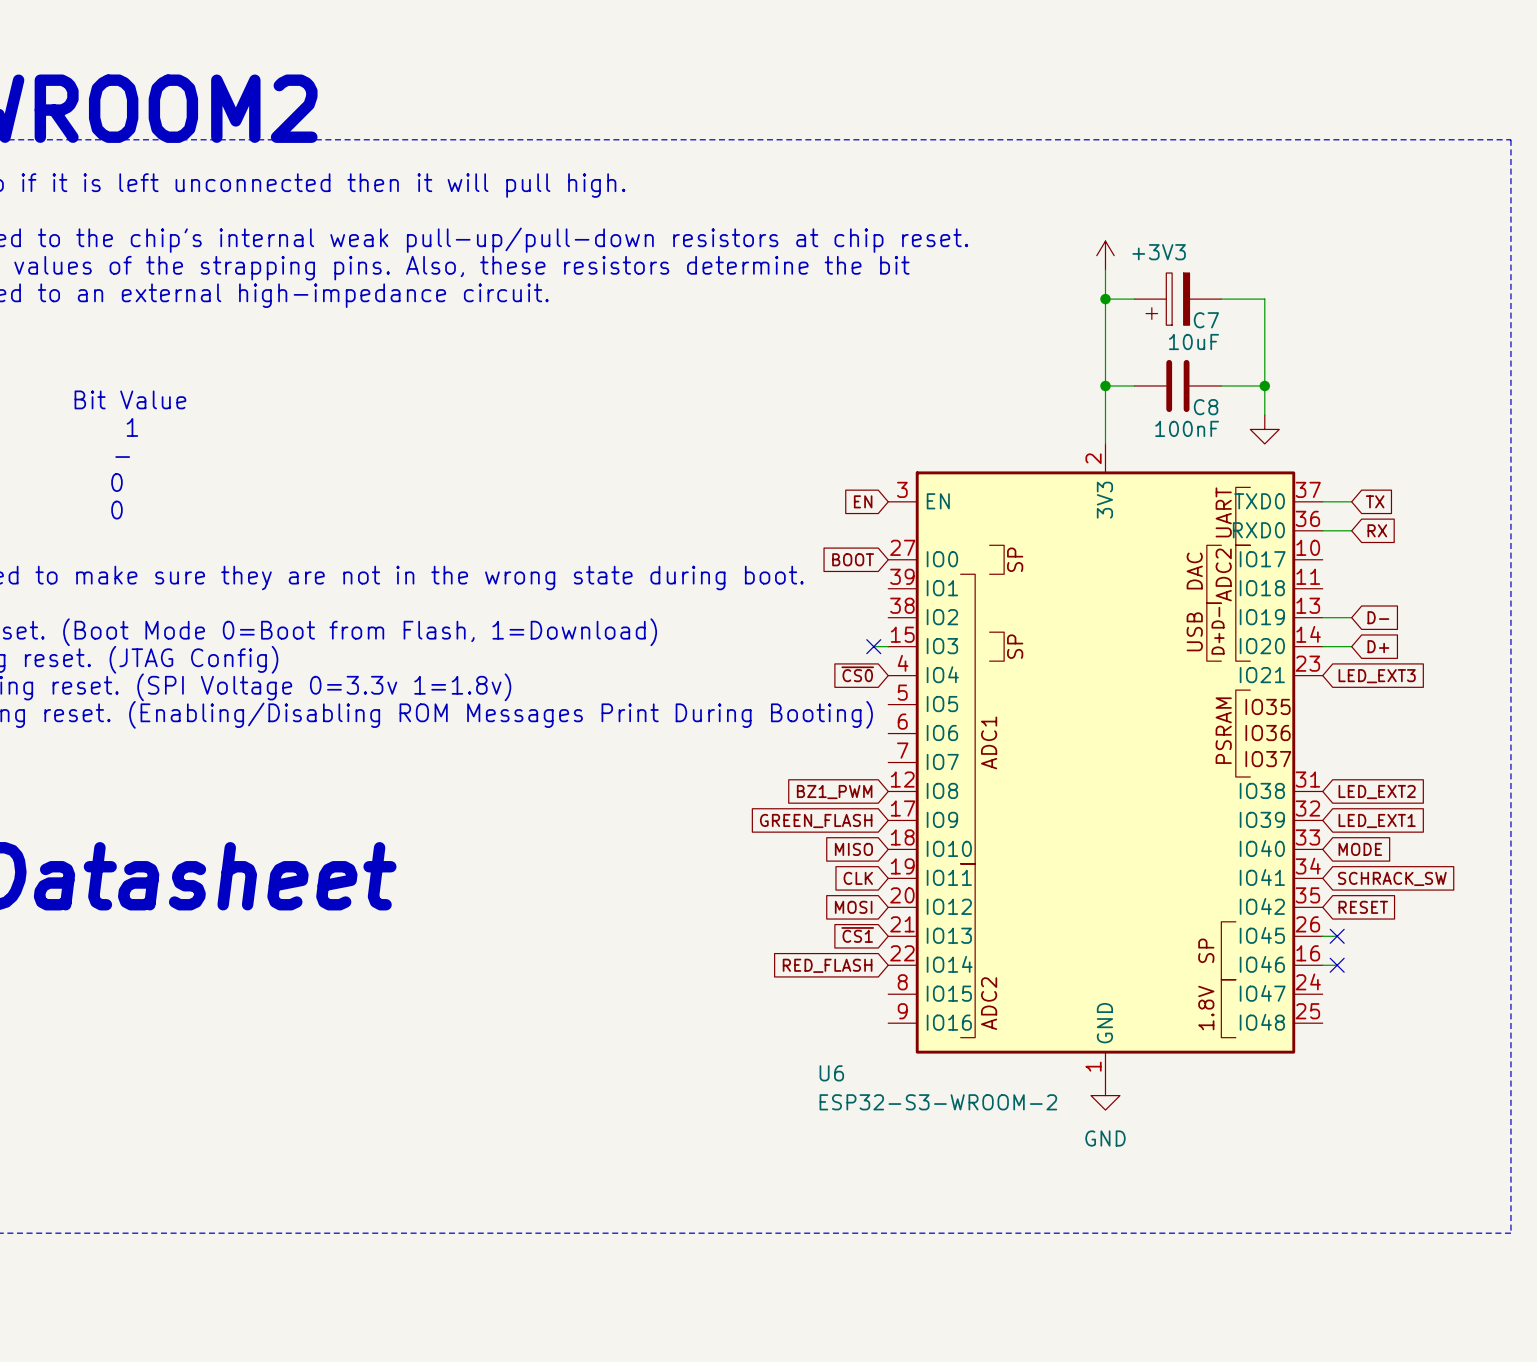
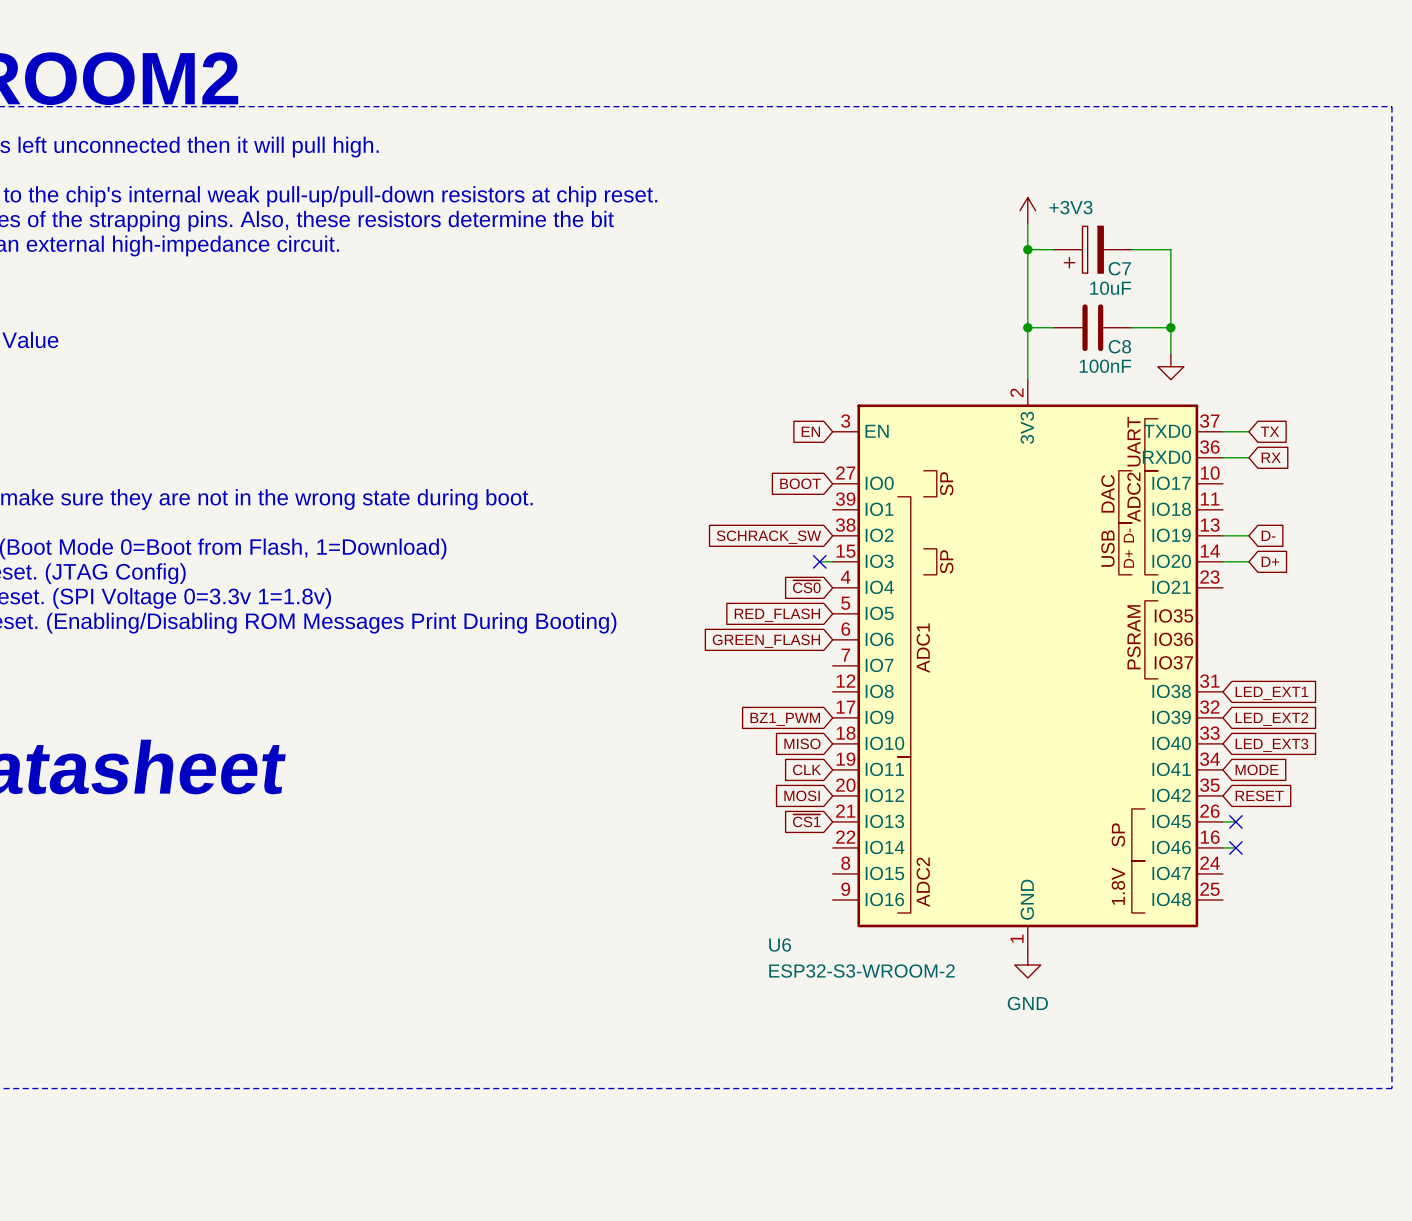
global label: none -> SCHRACK_SW (769, 537)
global label: LED_EXT3 (1377, 676) -> none
global label: none -> GREEN_FLASH (766, 641)
global label: BZ1_PWM (834, 792) -> none
global label: LED_EXT2 (1377, 792) -> LED_EXT1 (1271, 693)
global label: GREEN_FLASH (816, 820) -> BZ1_PWM (785, 719)
global label: LED_EXT1 (1377, 820) -> LED_EXT2 (1271, 719)
global label: MODE (1360, 849) -> LED_EXT3 (1271, 745)
global label: SCHRACK_SW (1392, 878) -> MODE (1257, 769)
global label position: RED_FLASH (827, 965) -> RED_FLASH (777, 615)

